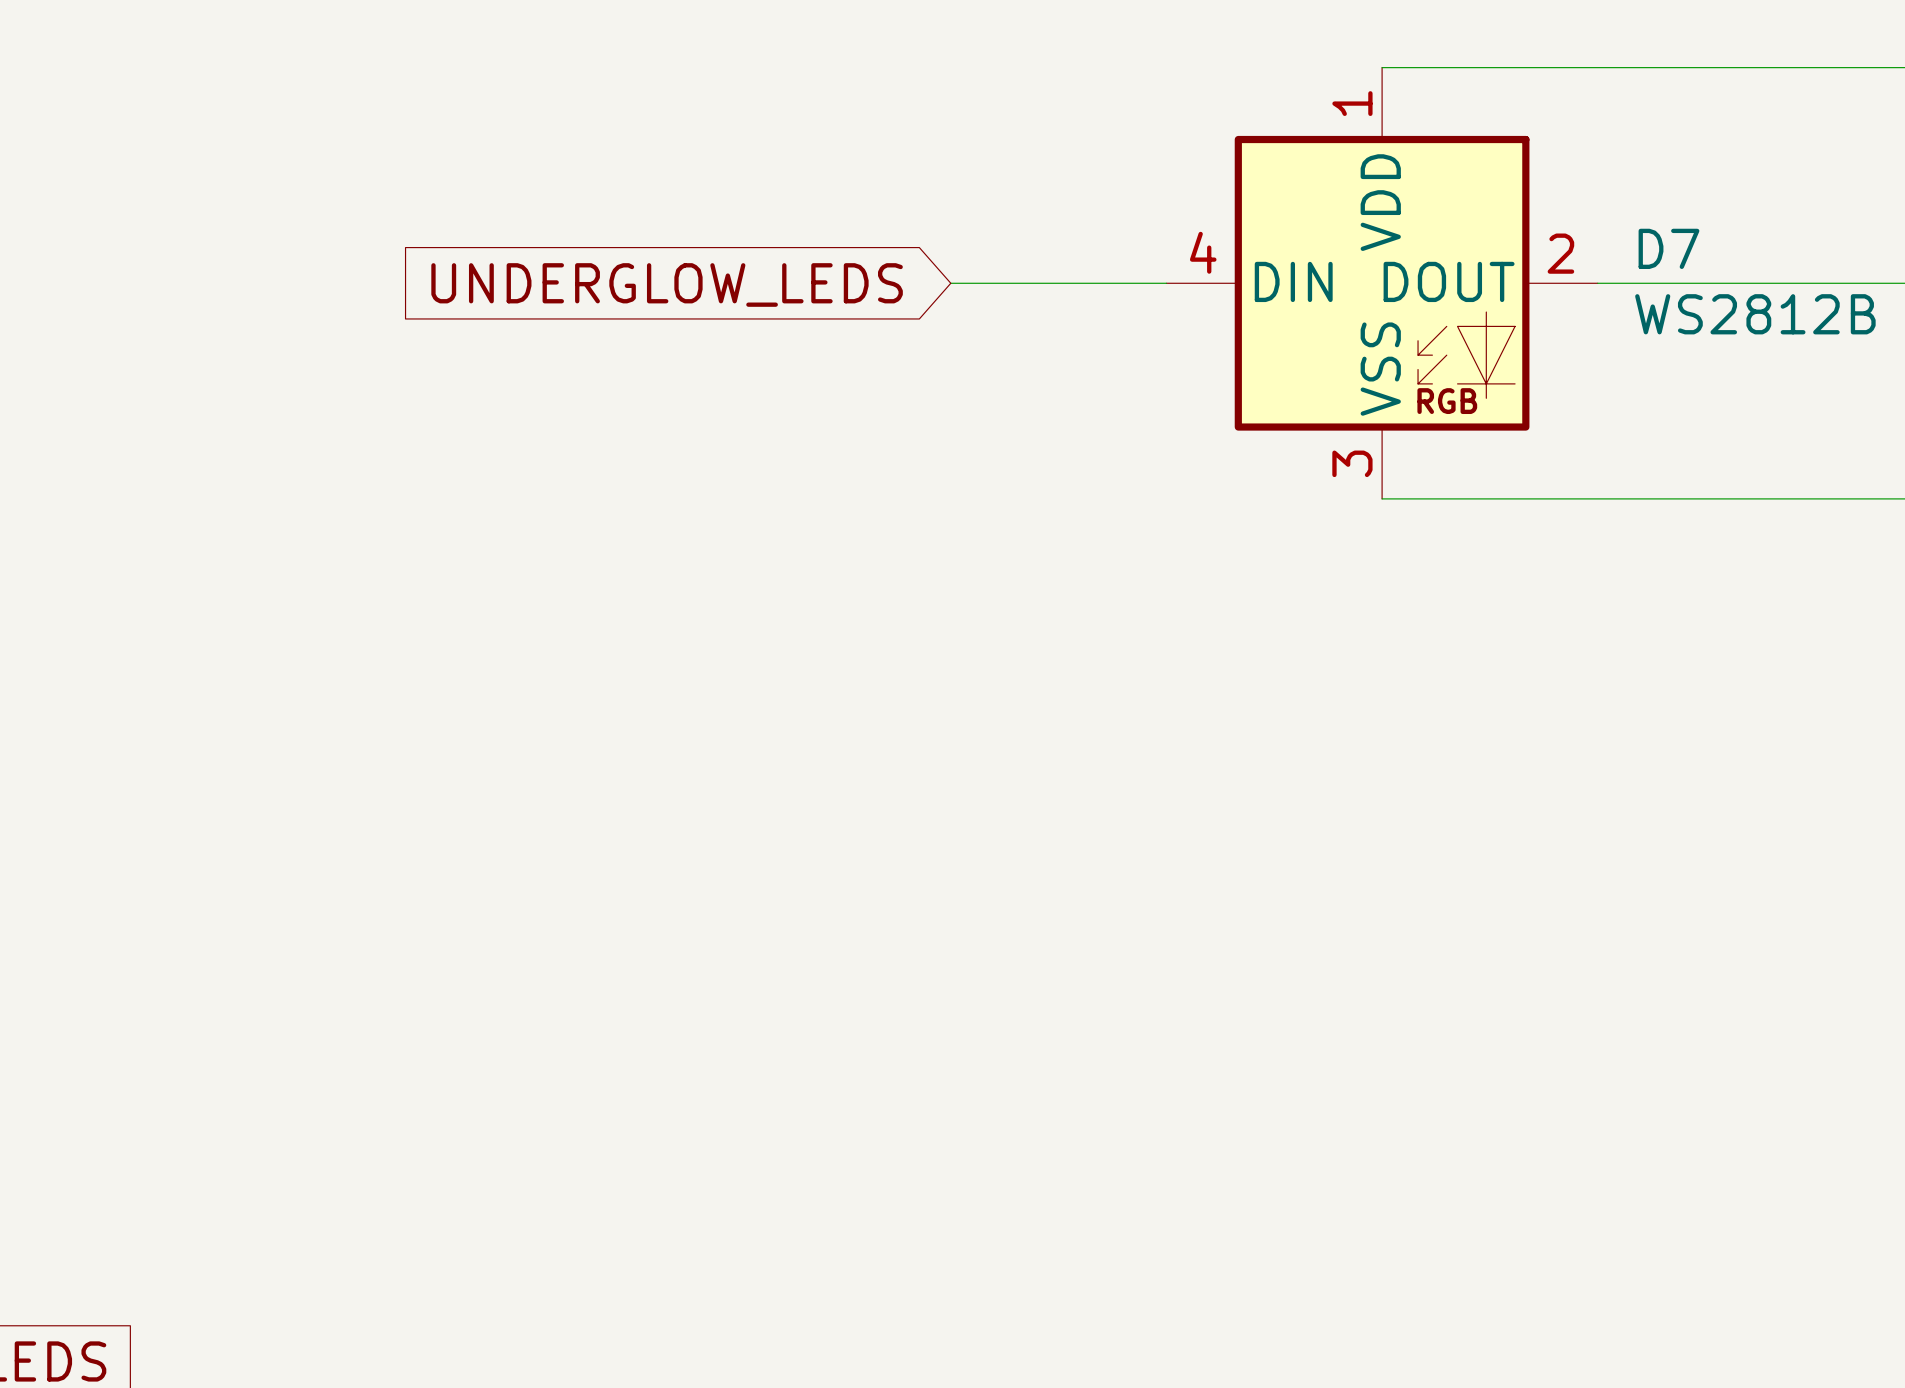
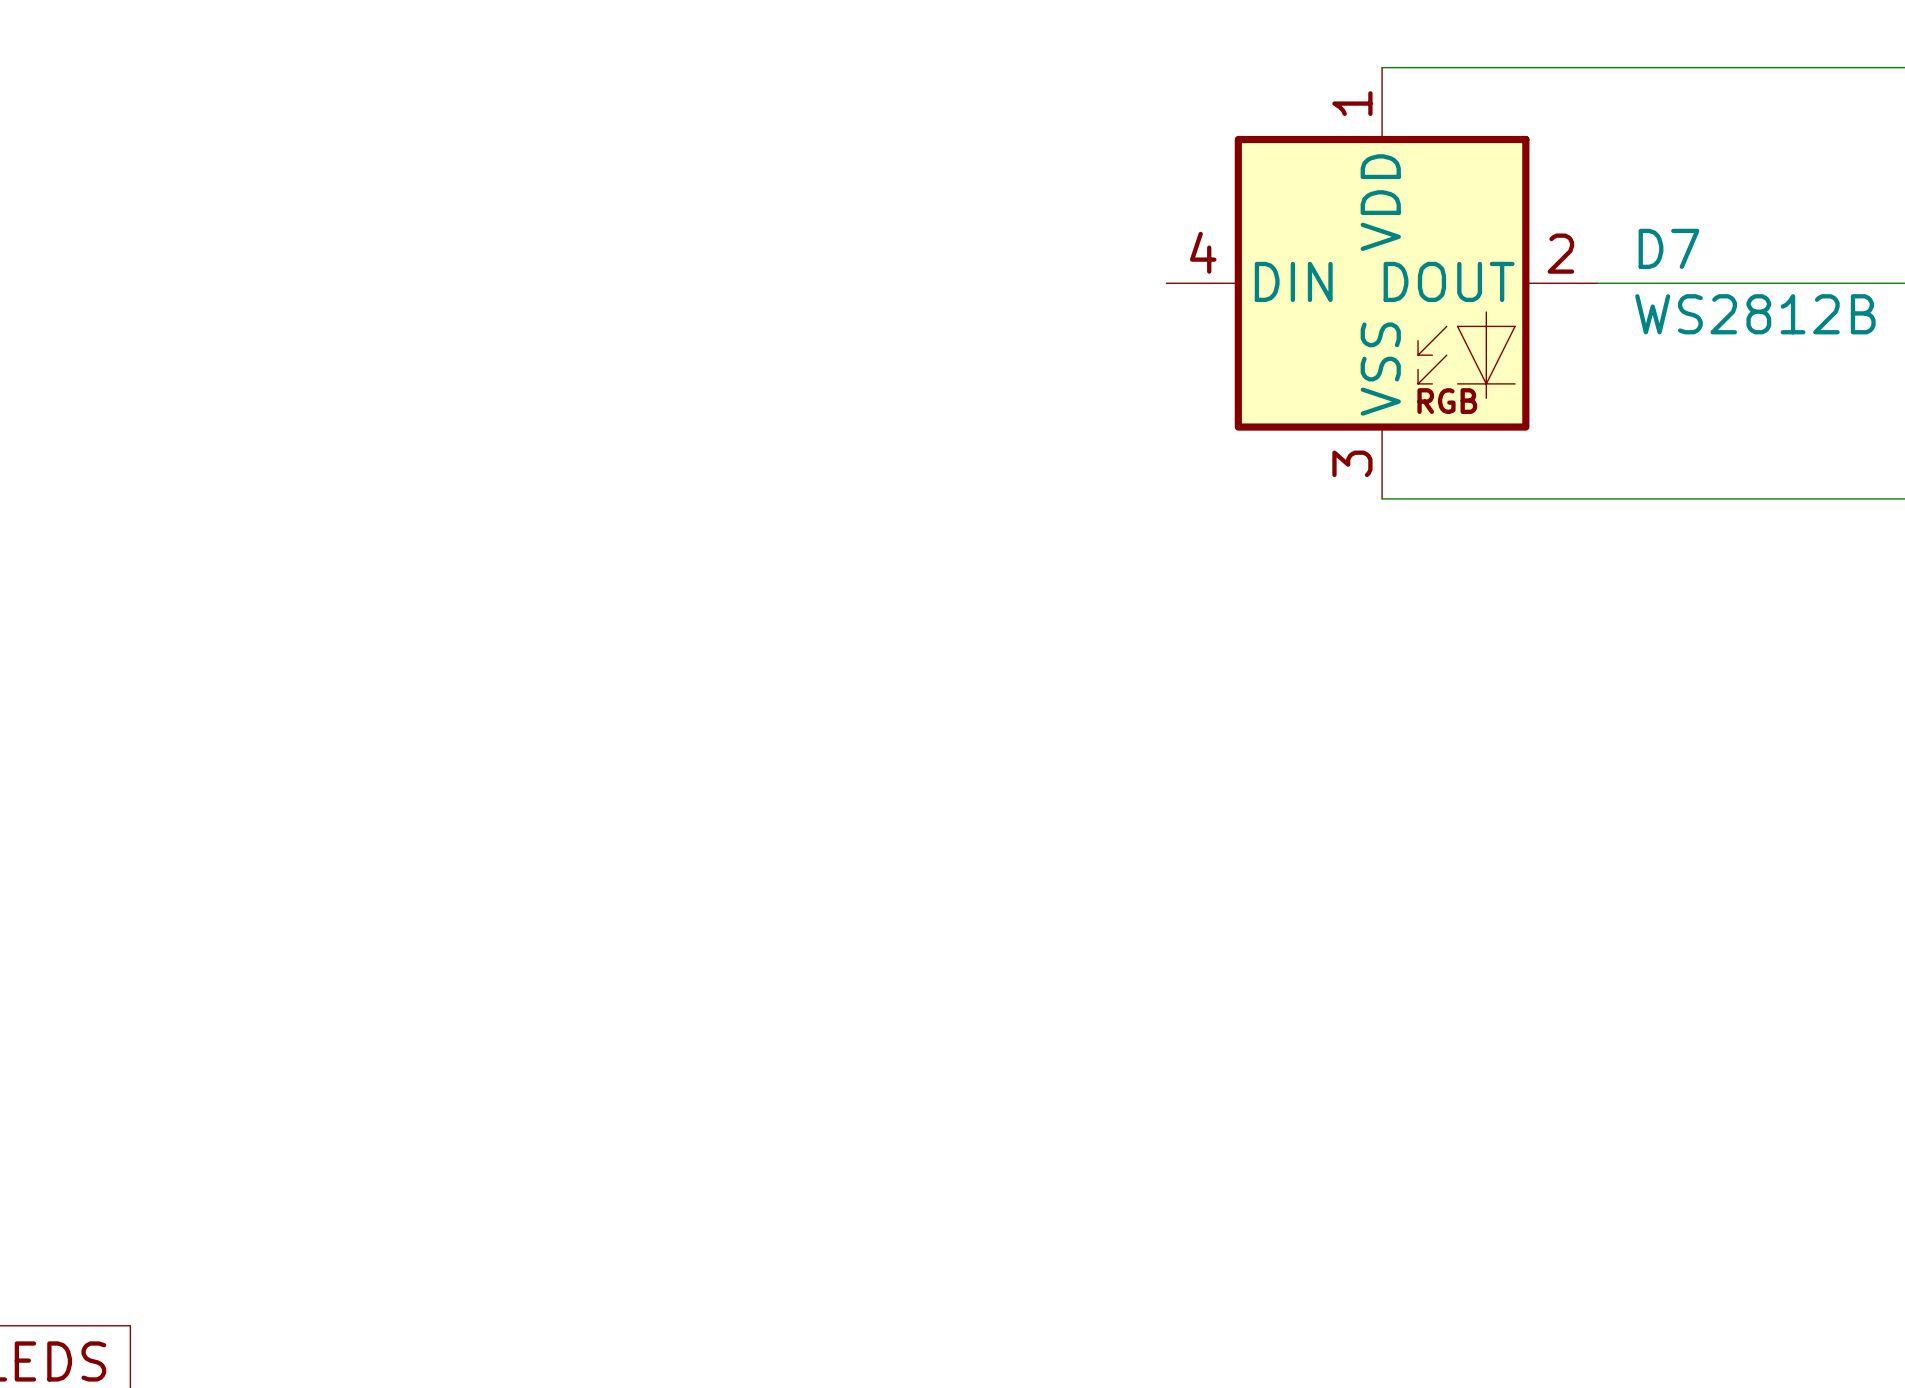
wire: (950, 283) (1166, 283) -> none
global label: UNDERGLOW_LEDS (667, 284) -> none

